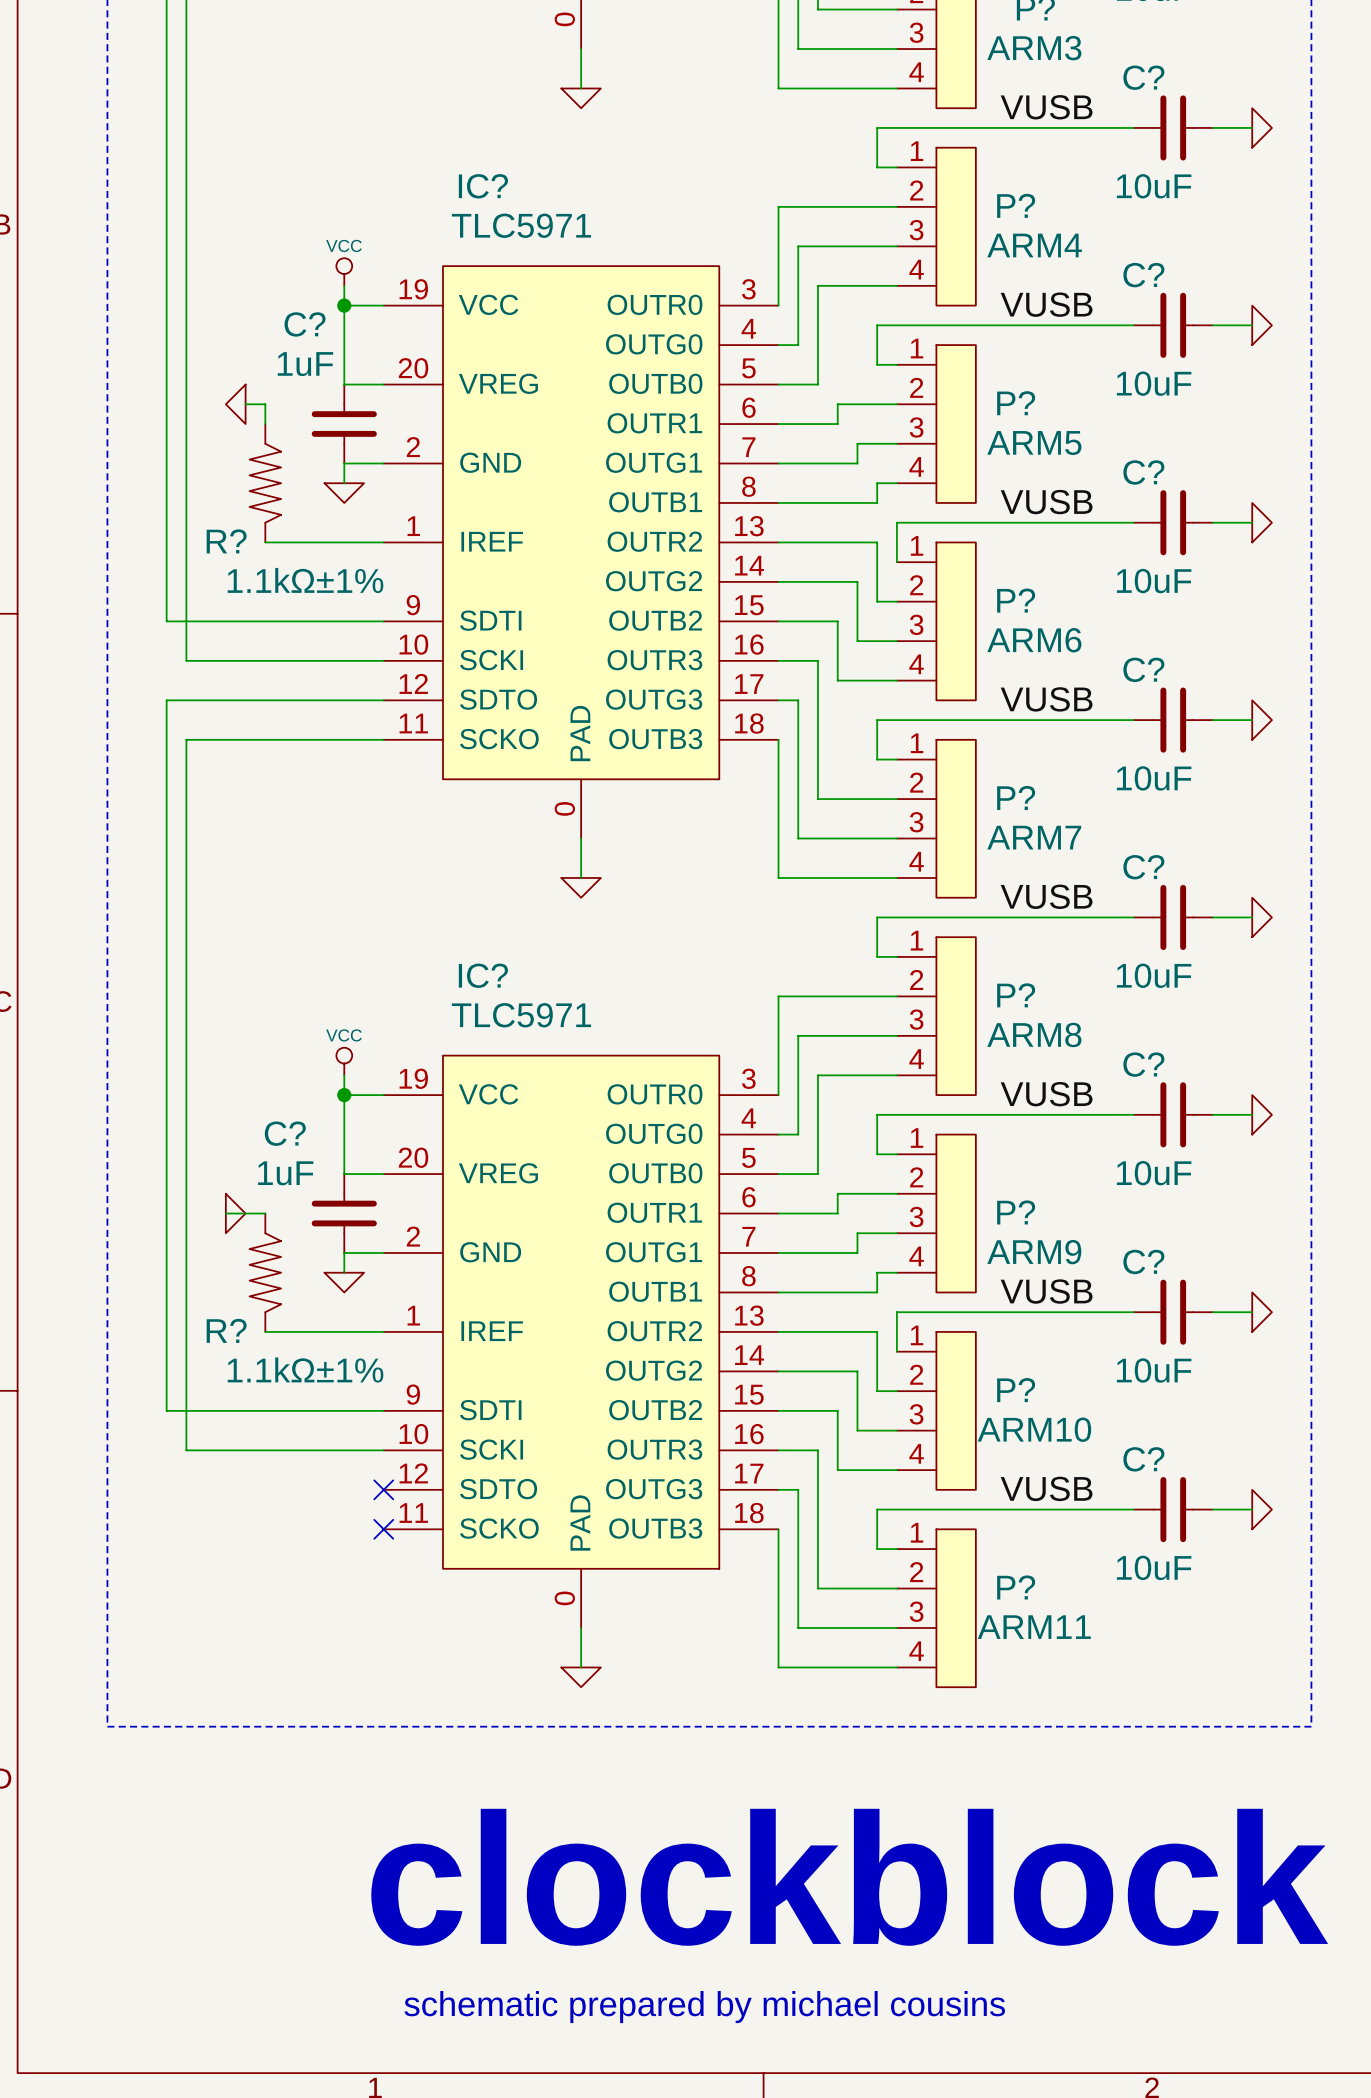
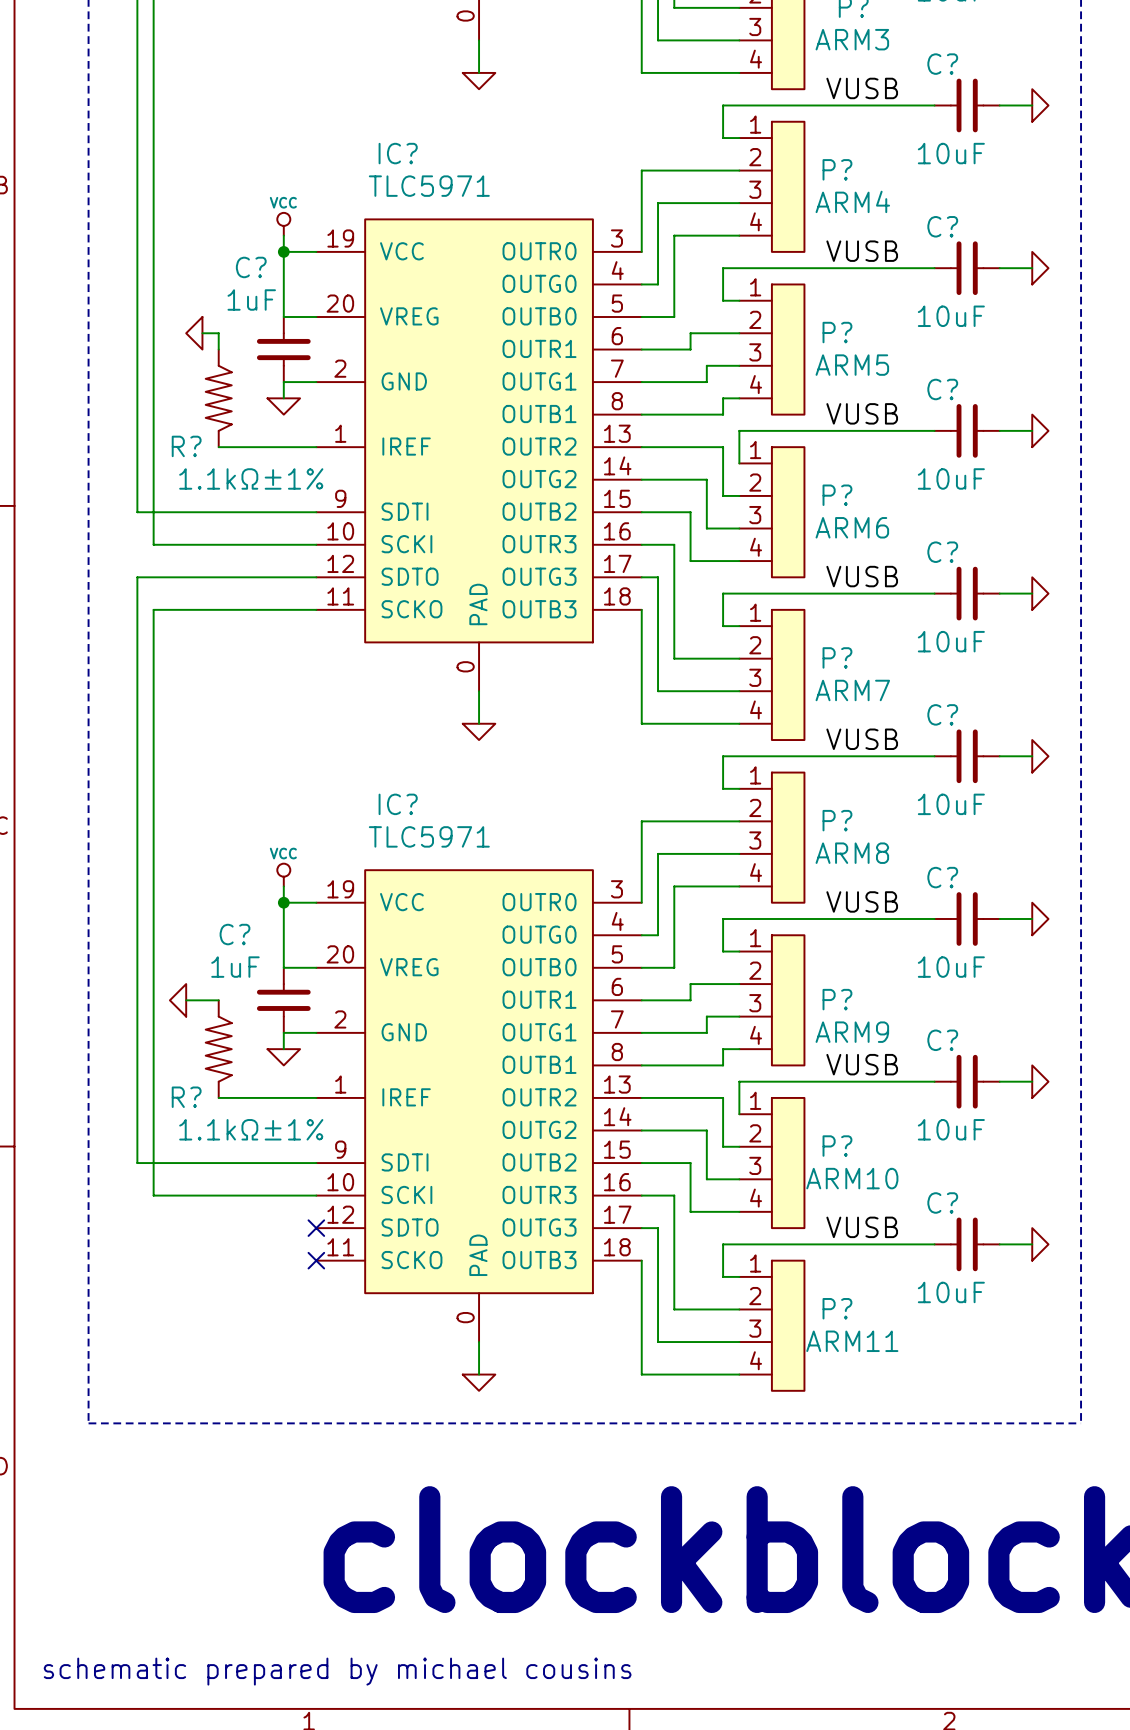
power symbol rotation: 0° (235, 1213) -> 180° (178, 1000)
text position: schematic prepared by michael cousins (704, 2007) -> schematic prepared by michael cousins (337, 1671)

